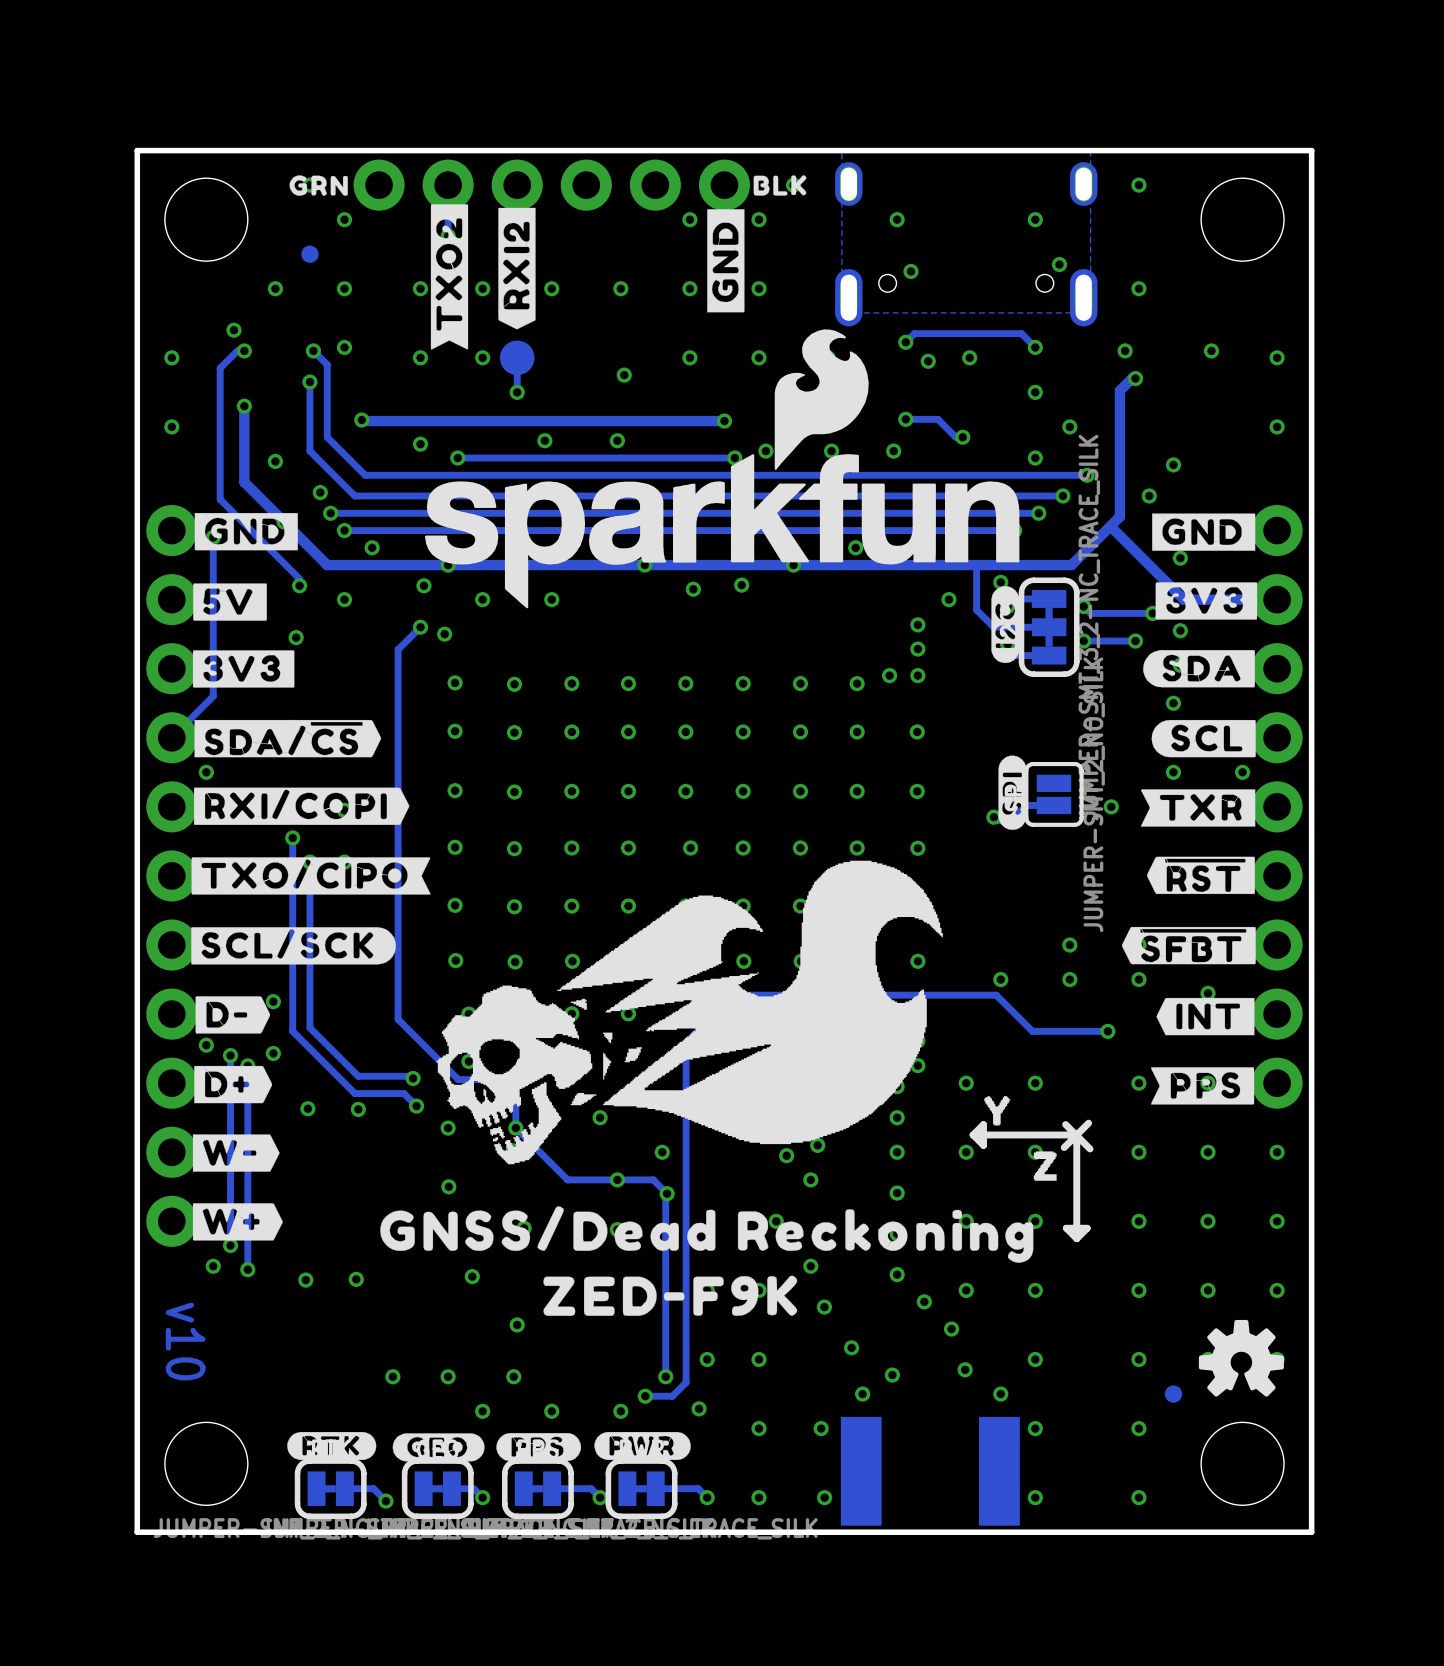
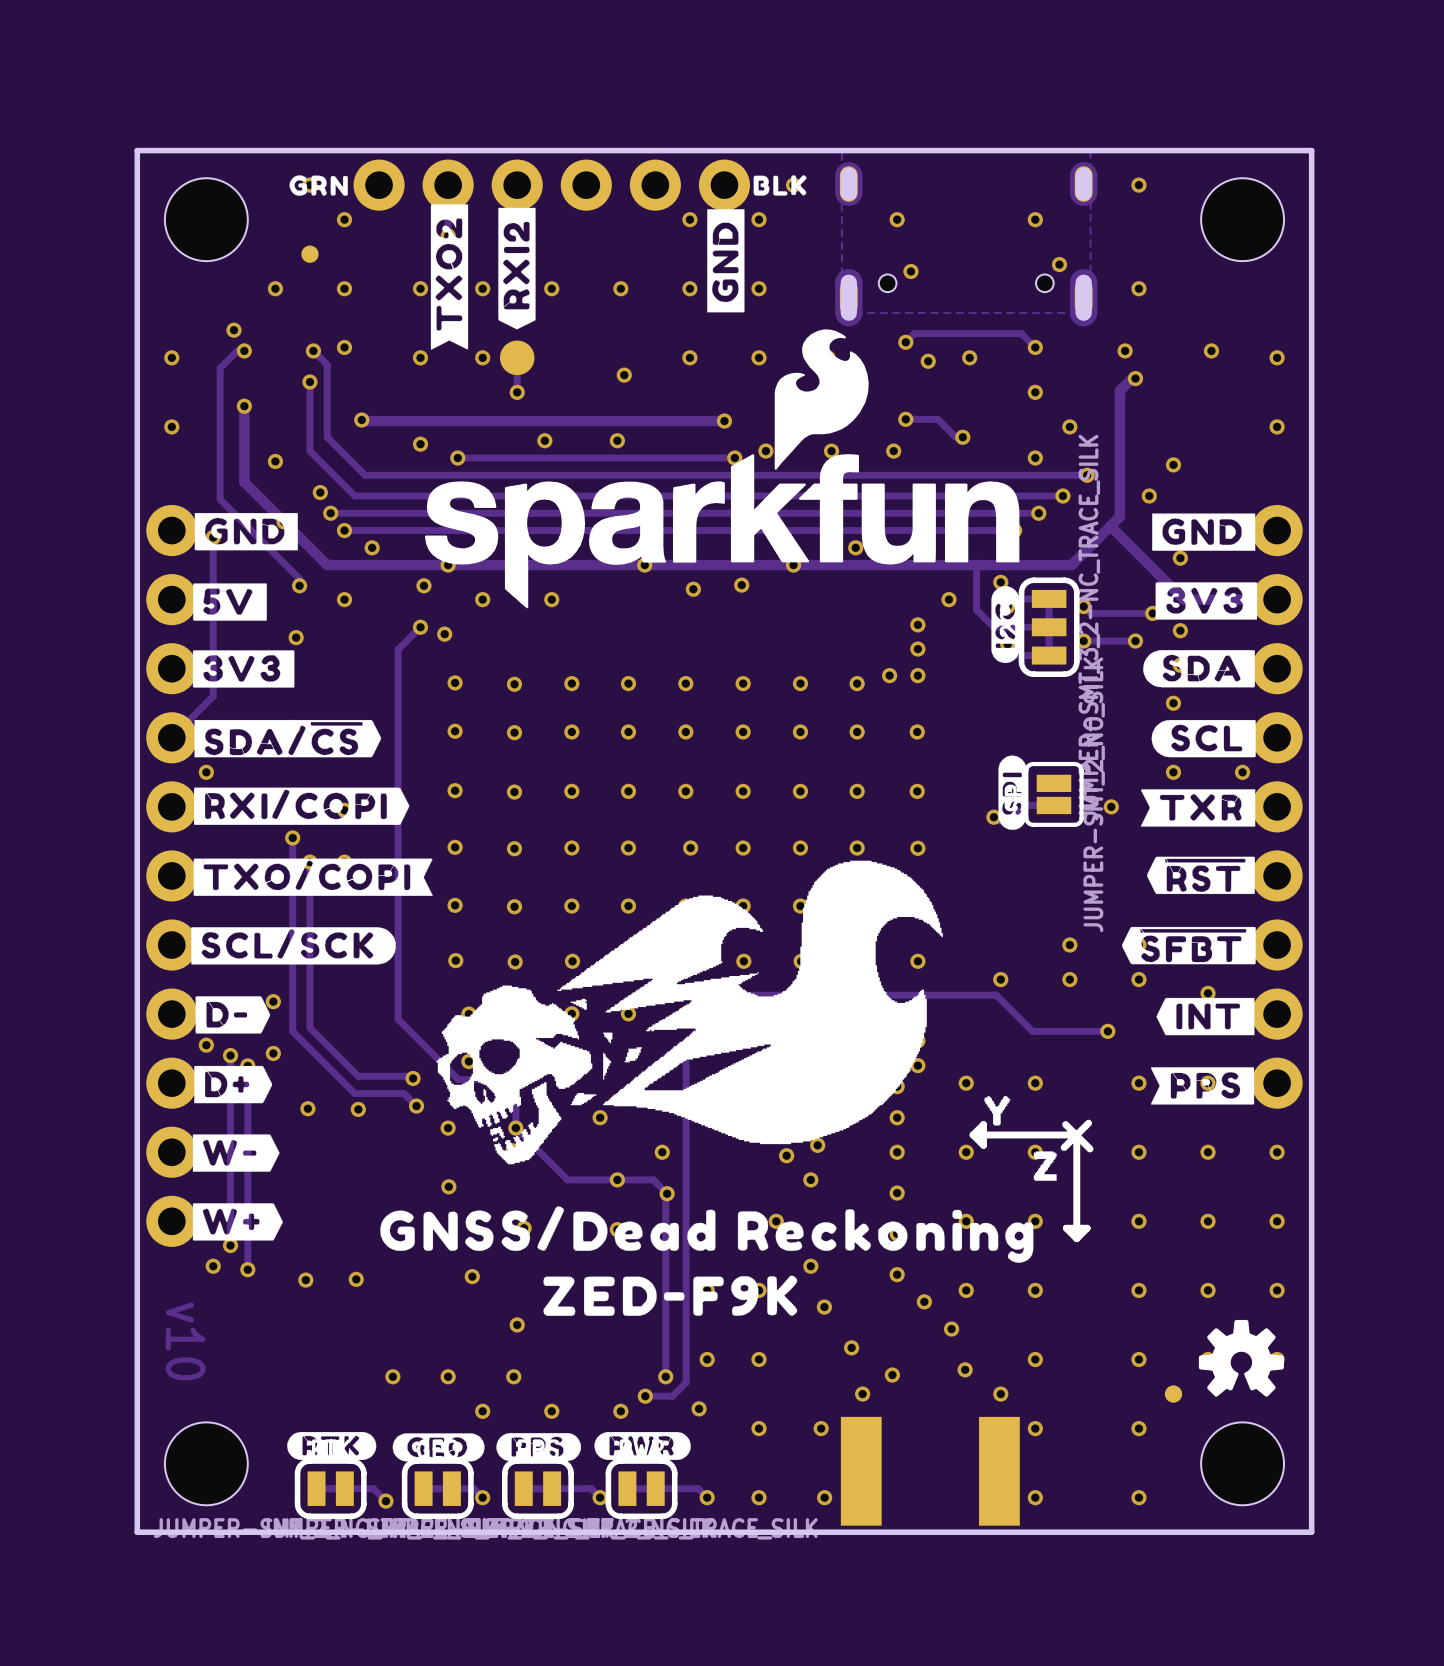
drawing shape: [191, 857, 431, 895] -> [193, 858, 433, 896]

